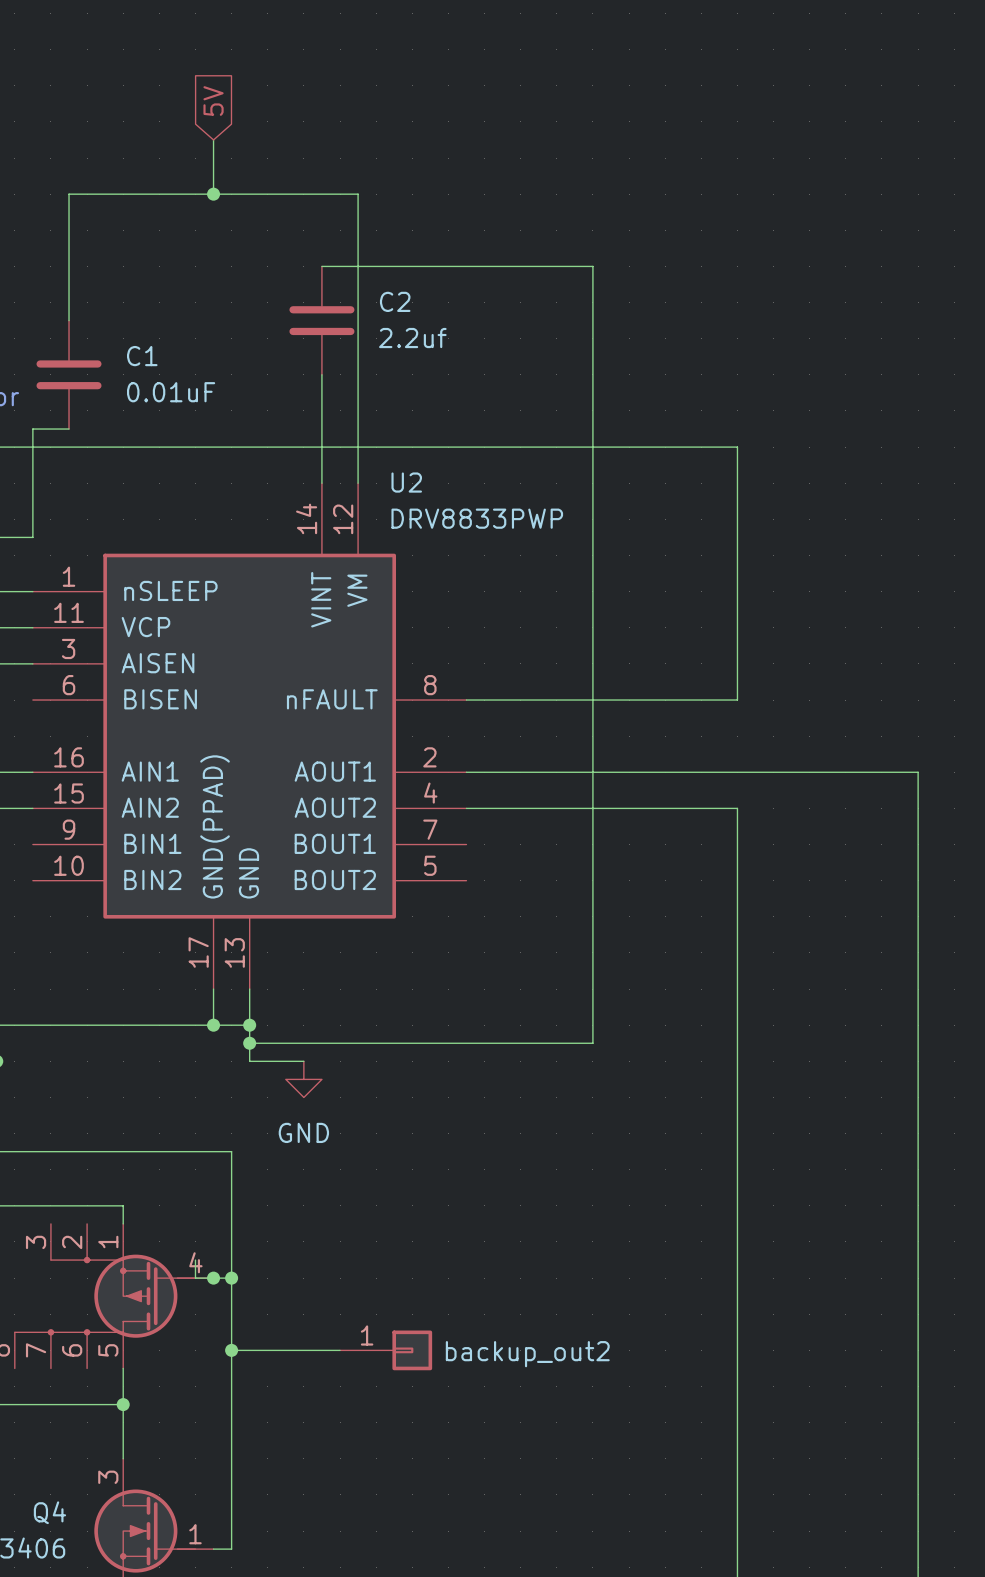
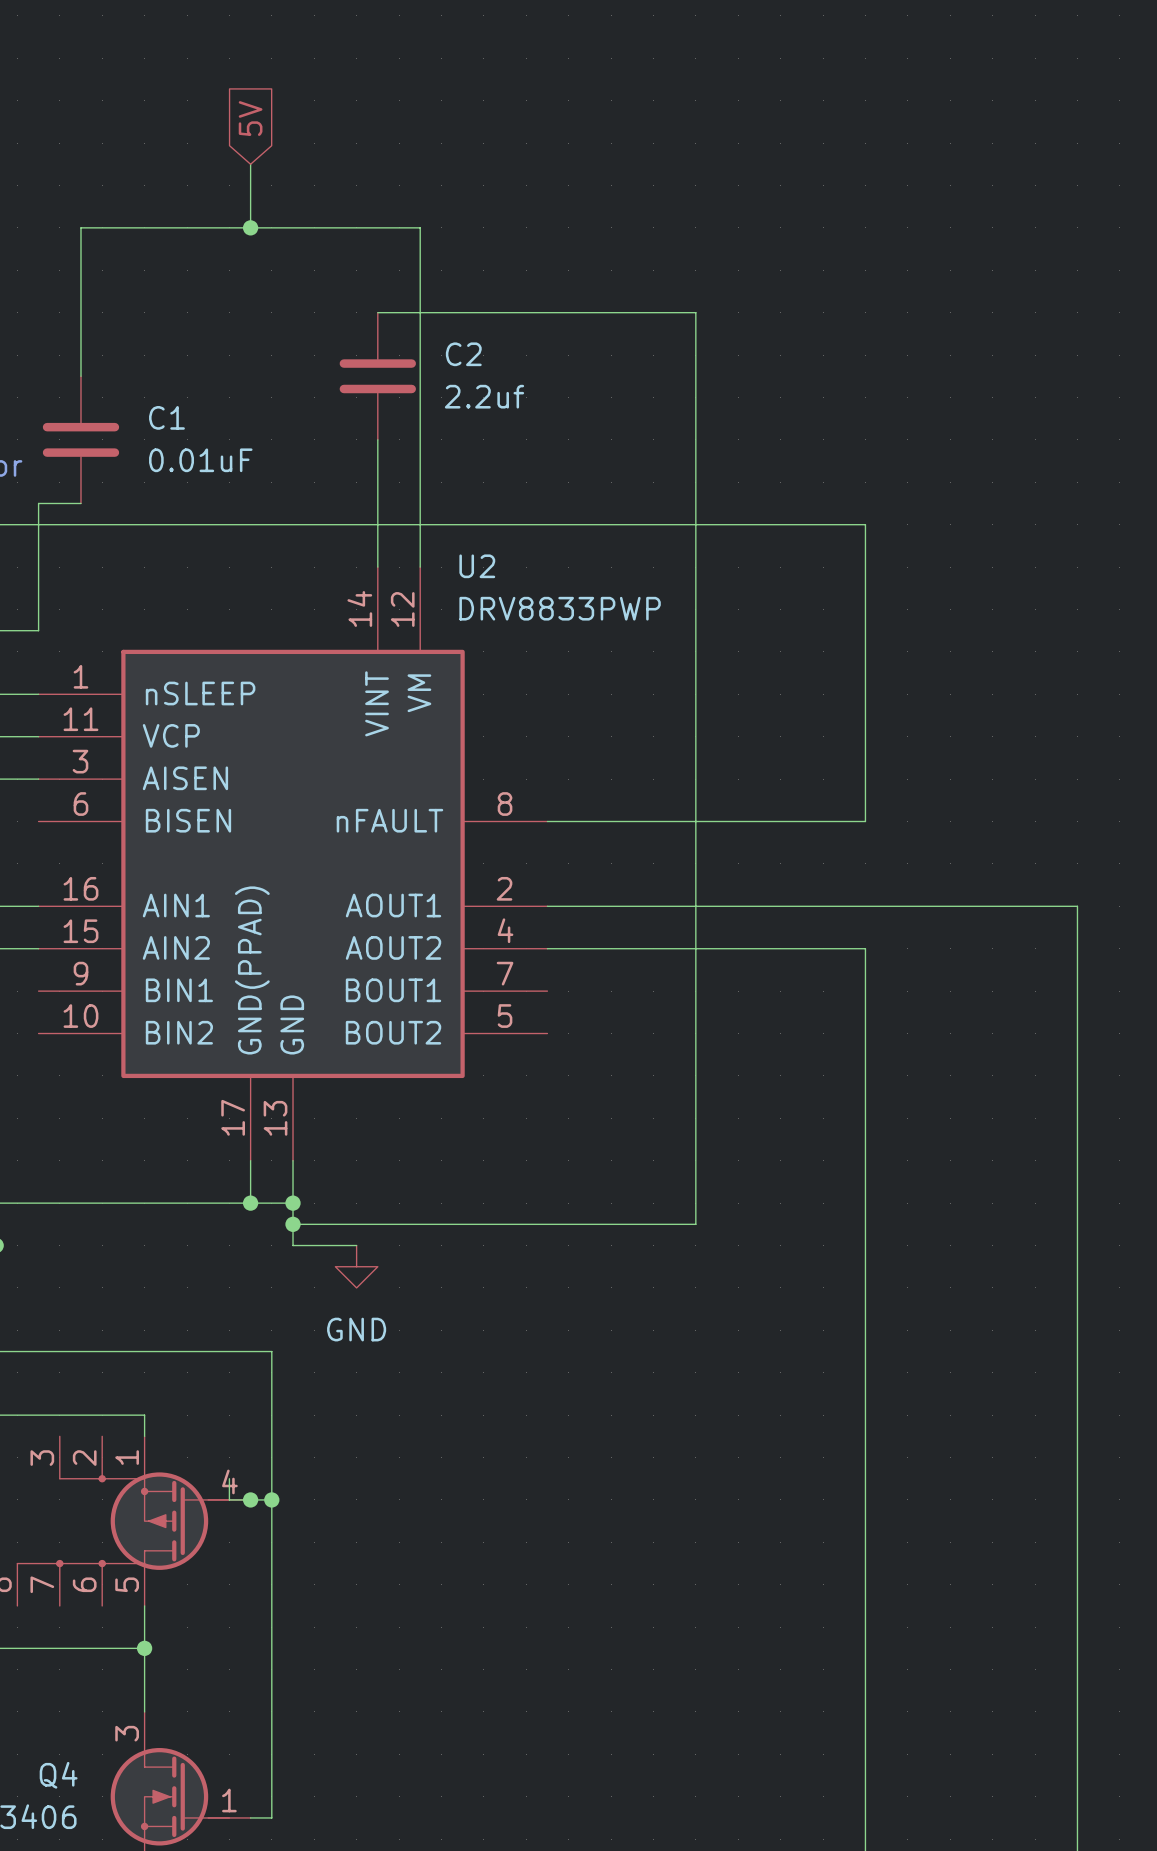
wire: (231, 1350) (340, 1350) -> none
junction: (231, 1350) -> none
backup_out2: (386, 1350) -> none

